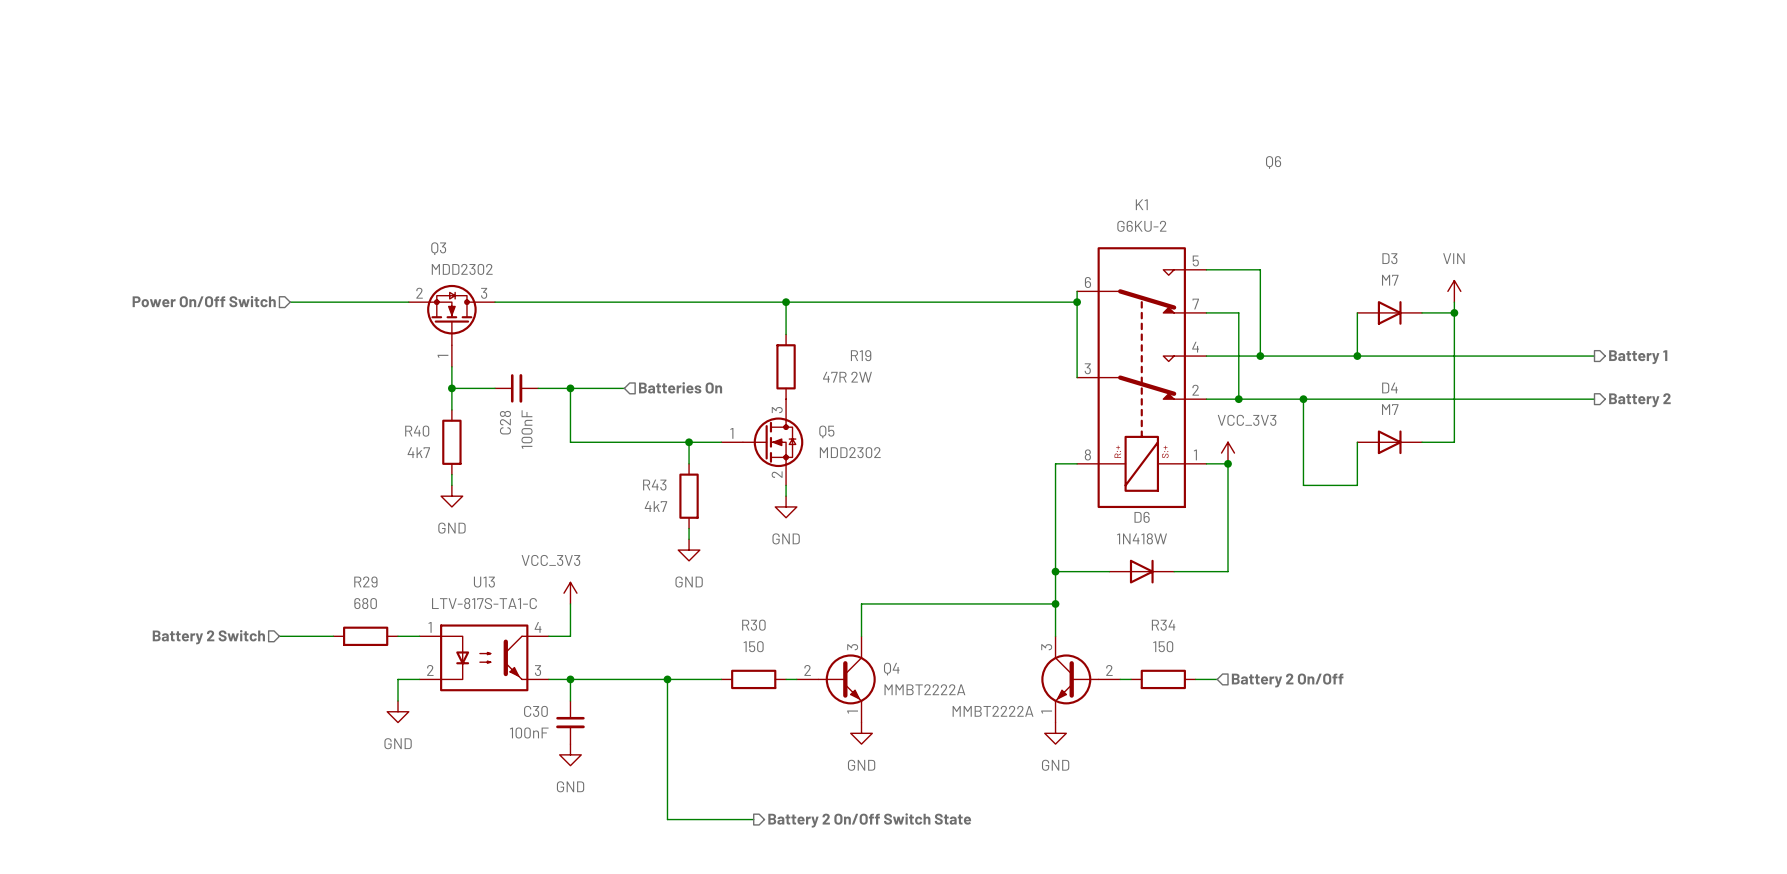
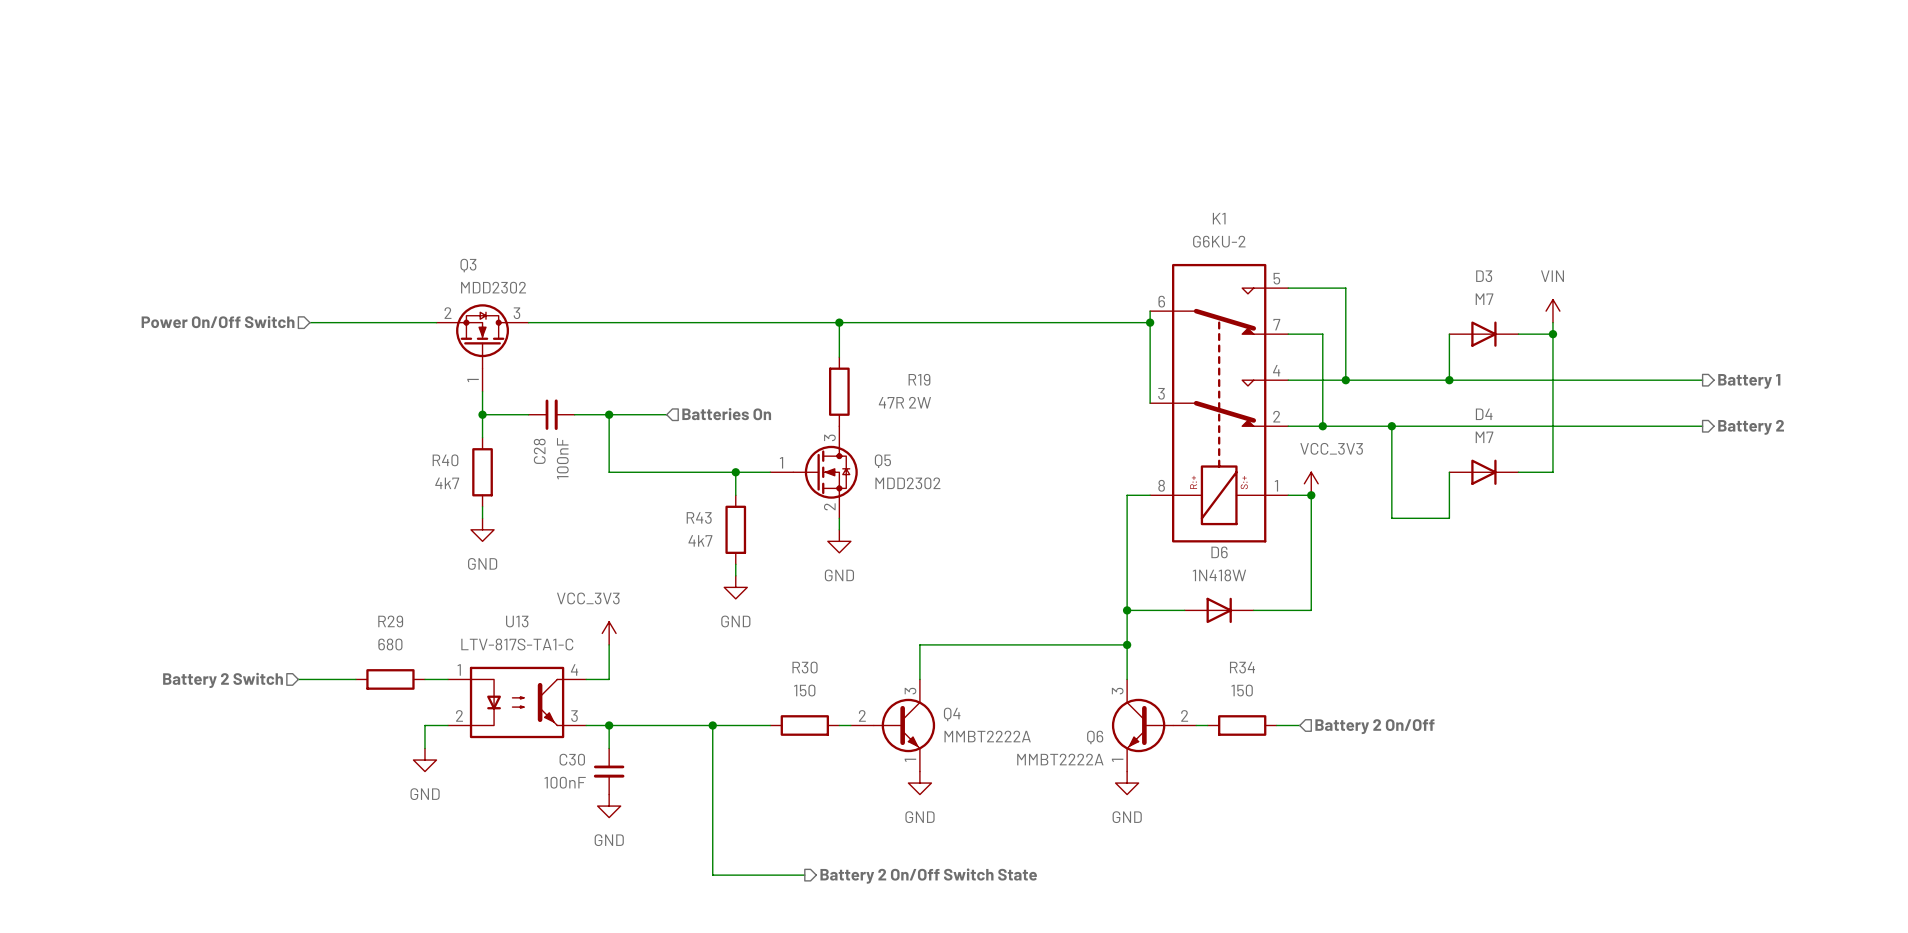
Q6 name position: Q6 (1273, 162) -> Q6 (1095, 737)

